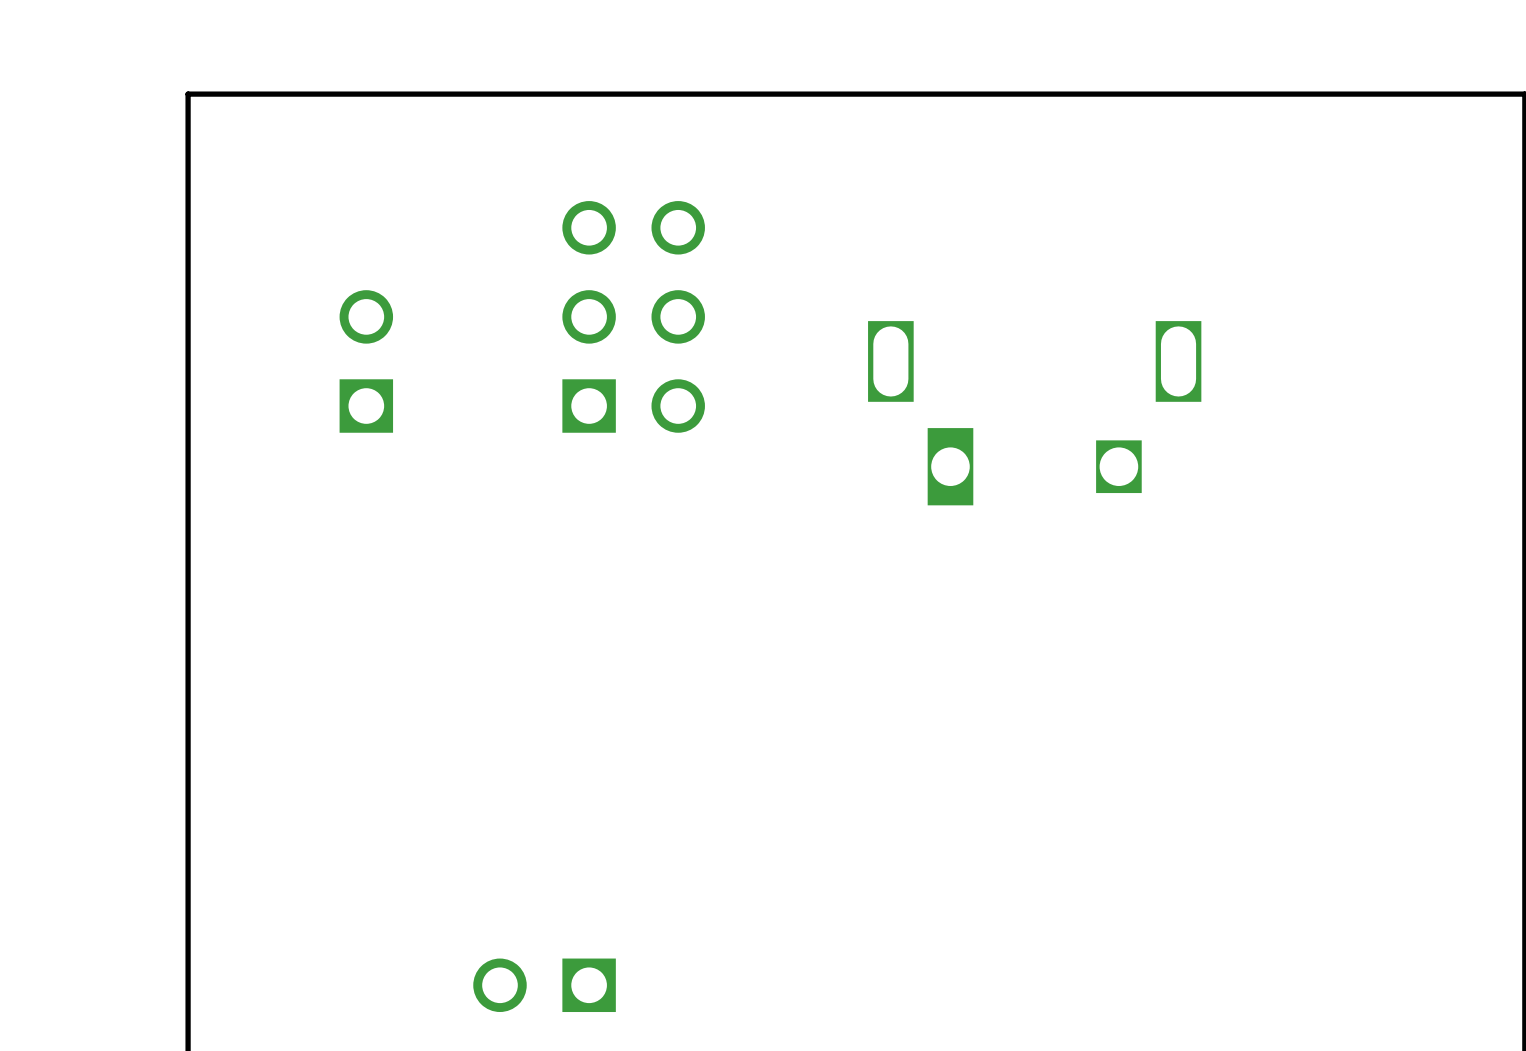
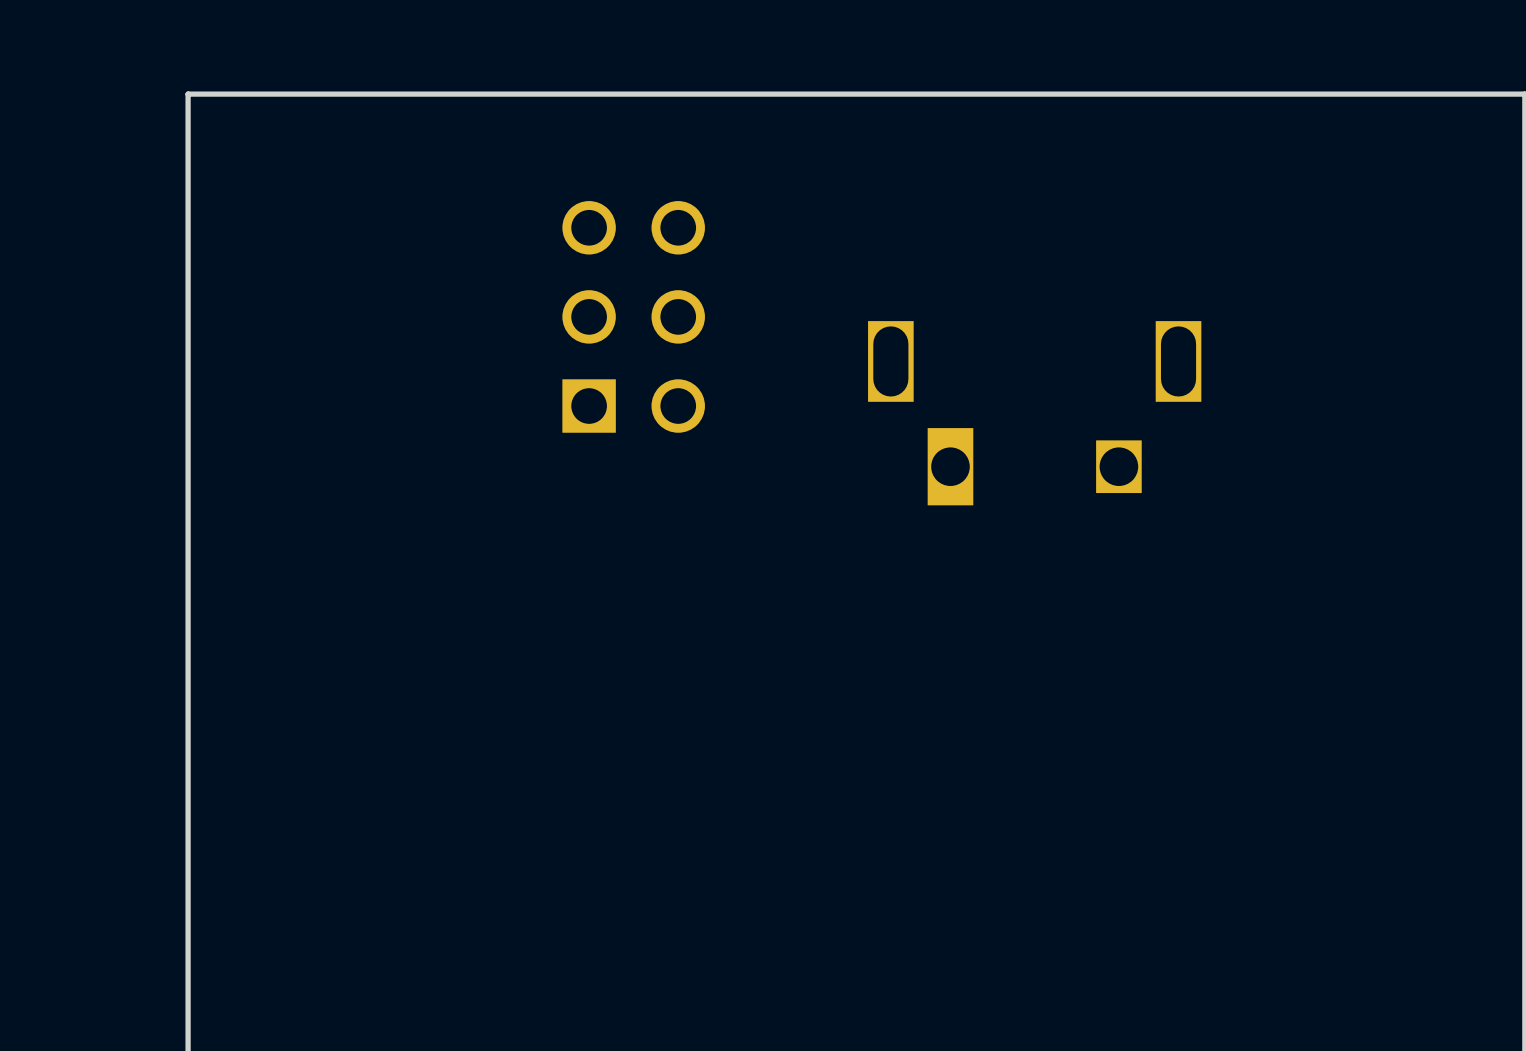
part: (366, 361) -> none
part: (544, 985) -> none

